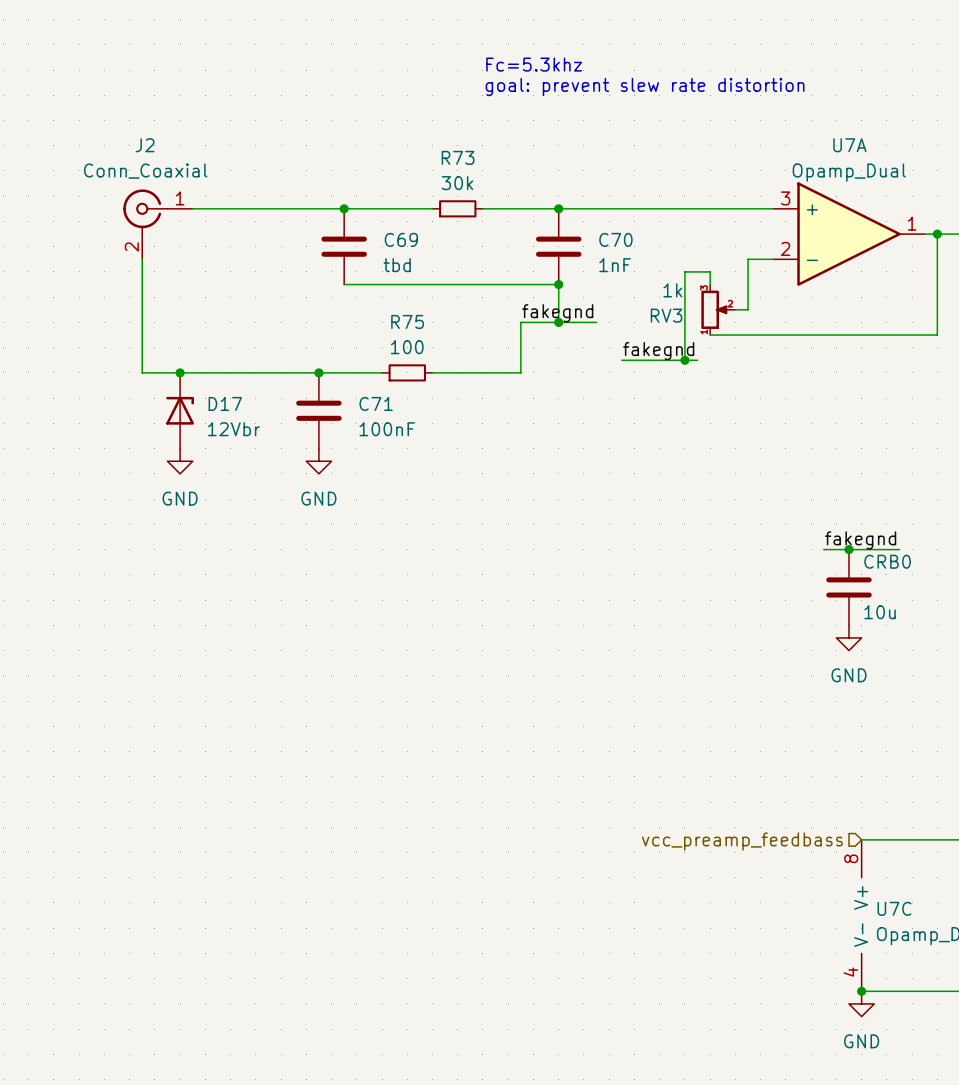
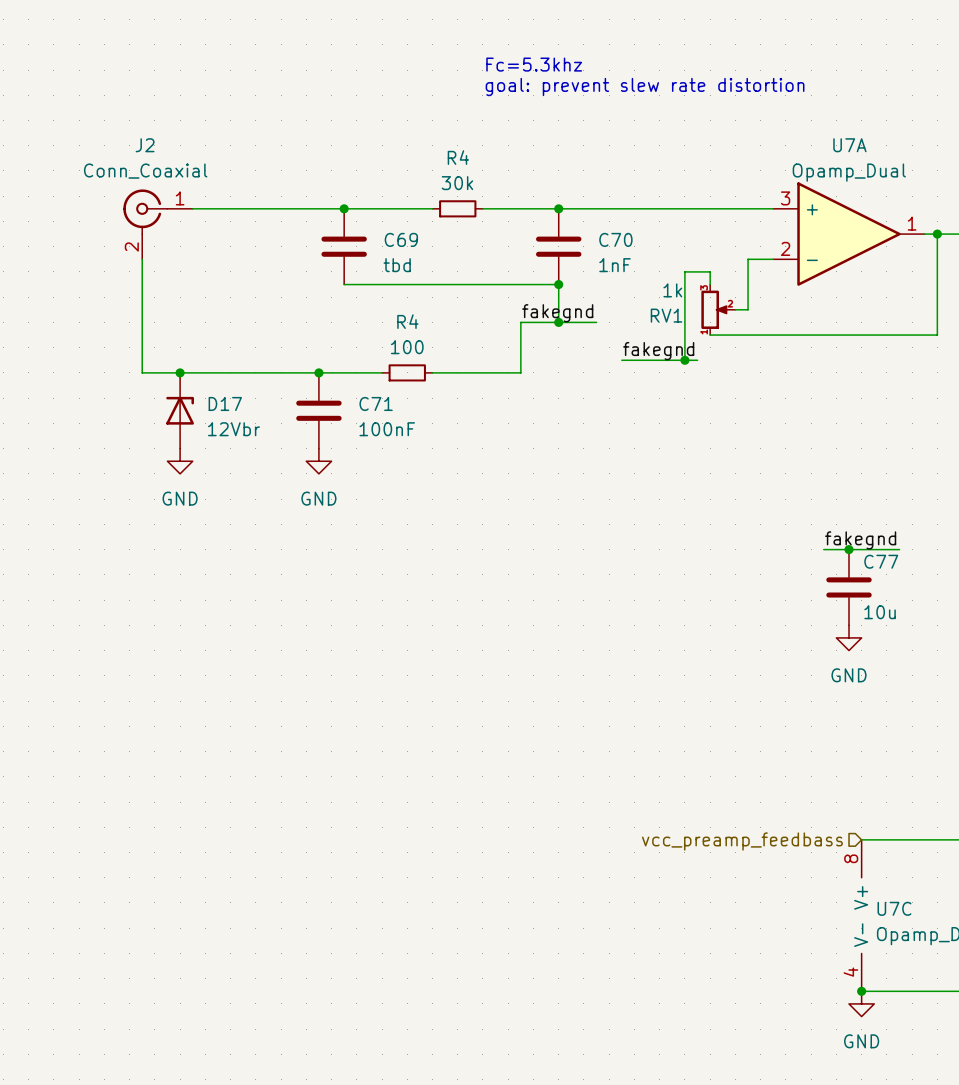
R73 name: R73 (458, 157) -> R4 (458, 157)
RV3 name: RV3 (666, 315) -> RV1 (666, 315)
R75 name: R75 (407, 321) -> R4 (407, 321)
CRB0 name: CRB0 (887, 561) -> C77 (881, 561)

